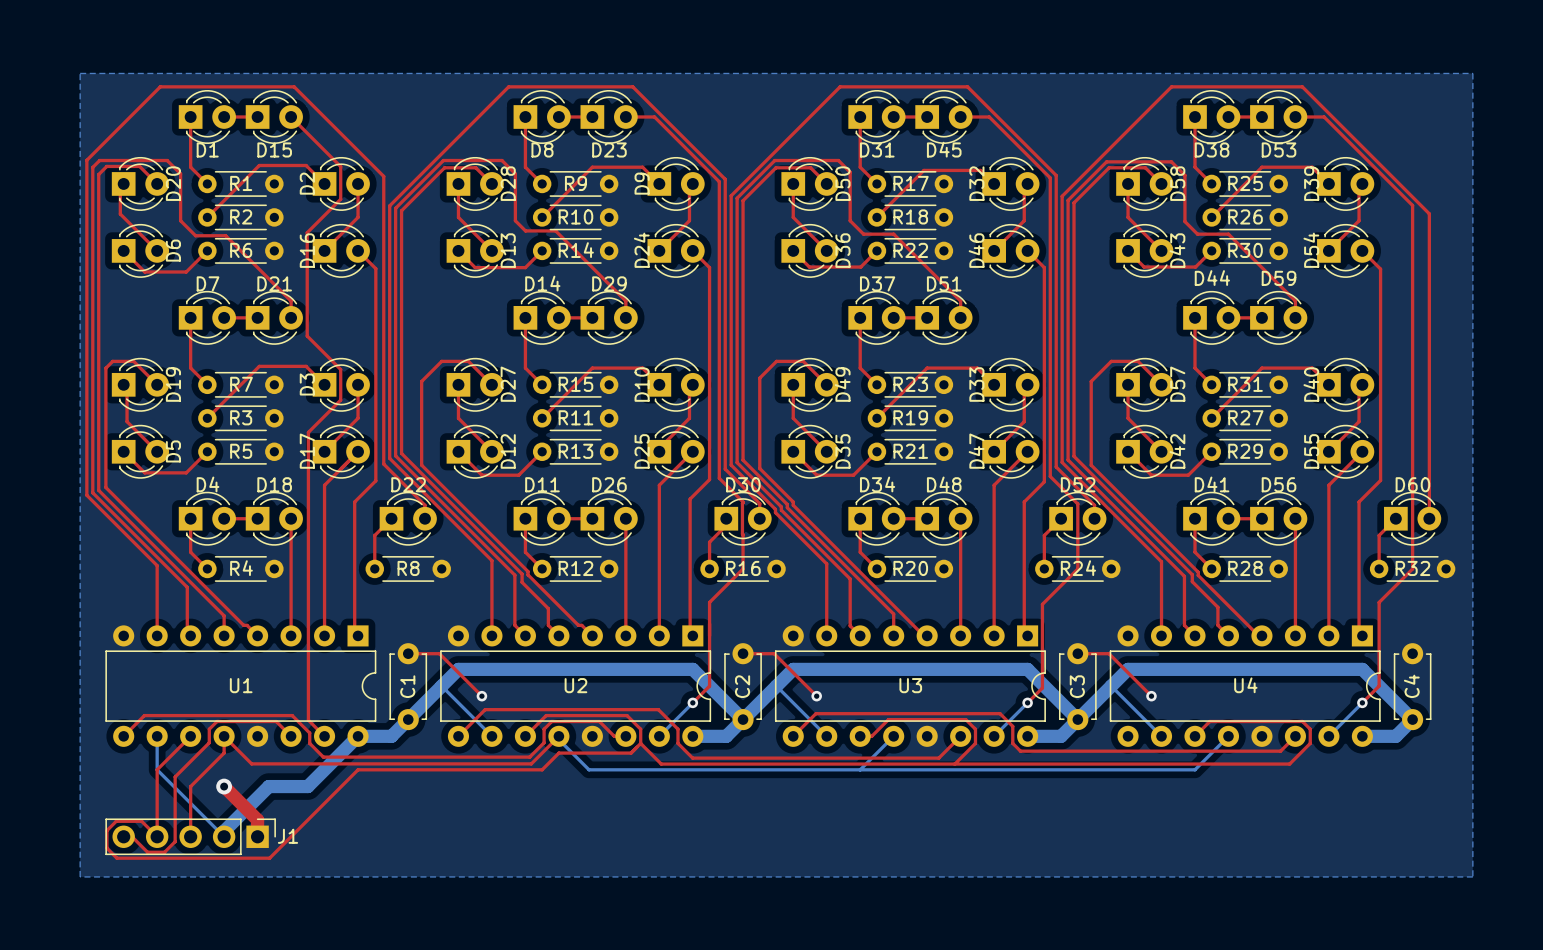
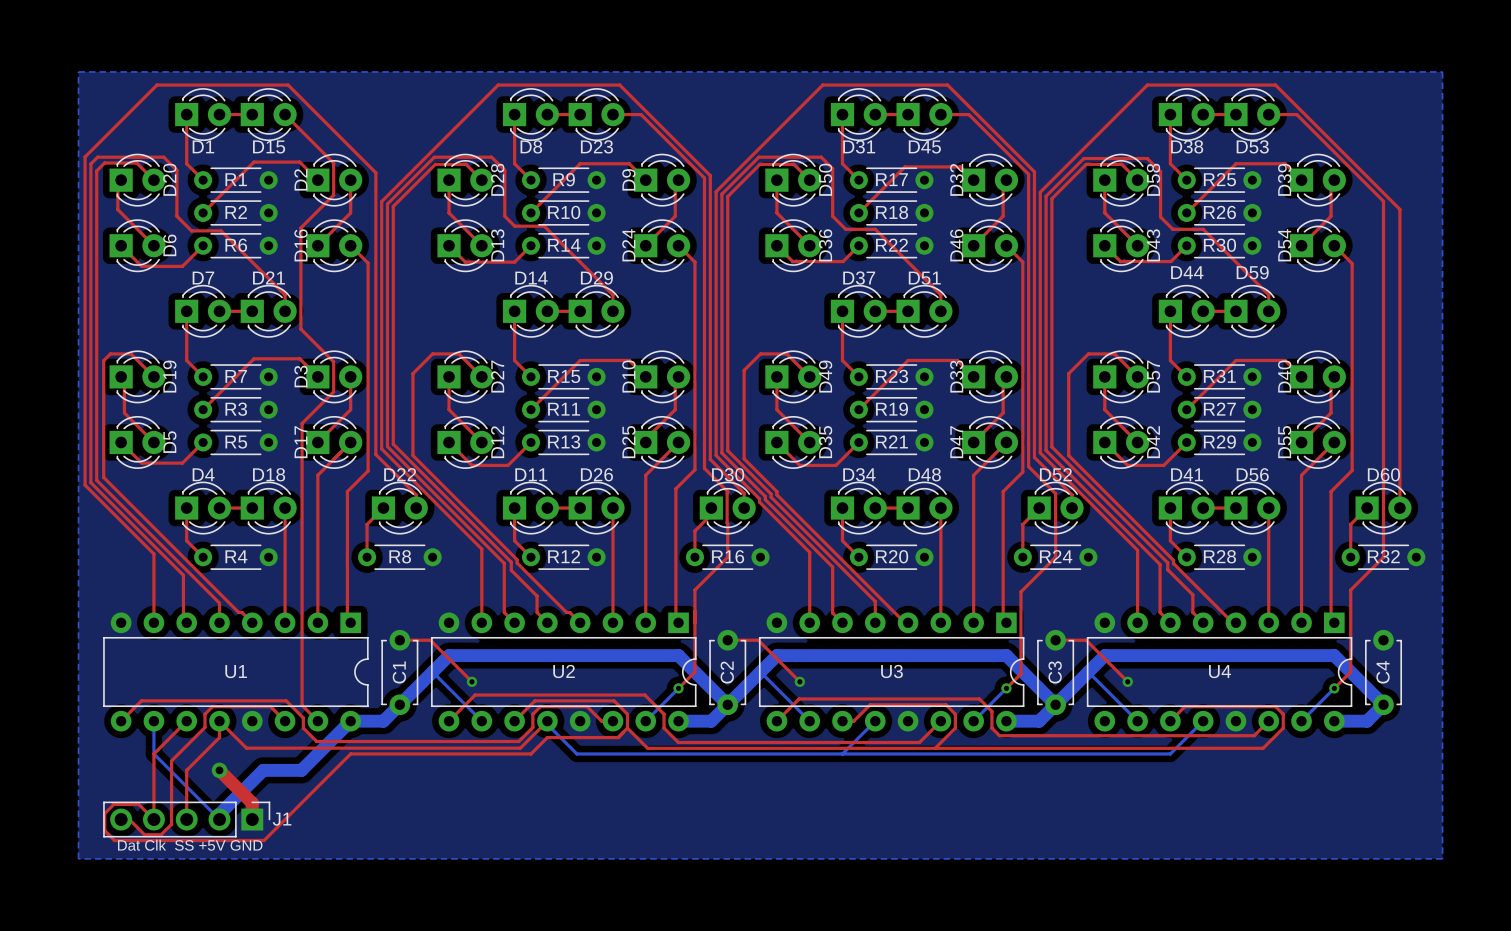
text: none -> Dat Clk SS +5V GND (190, 845)

